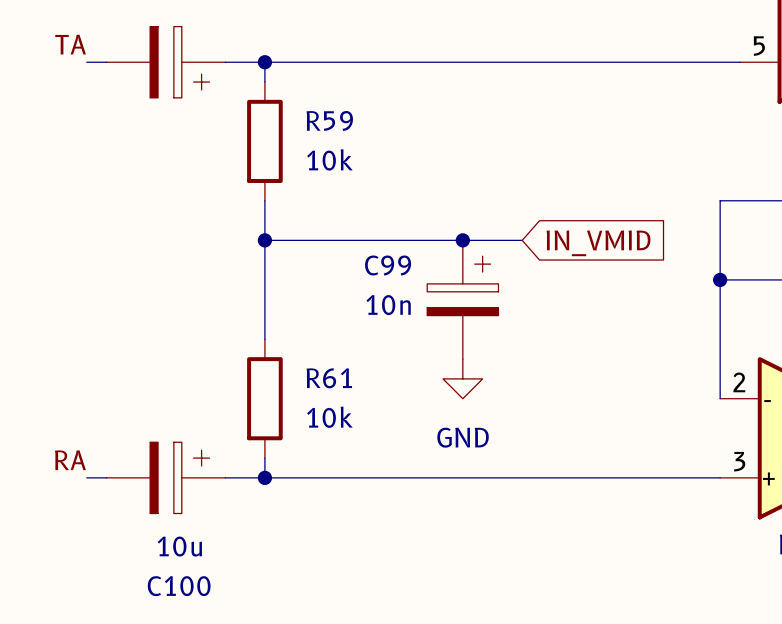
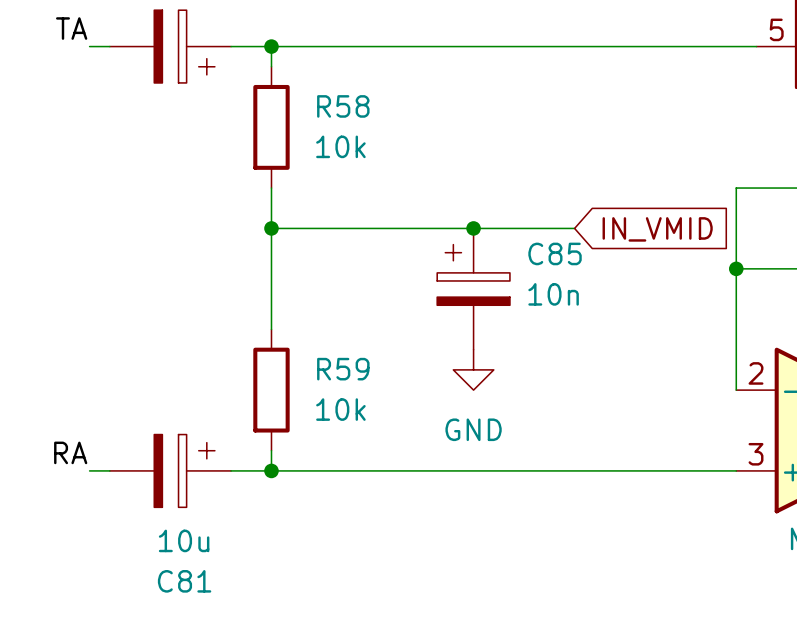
R59 name: R59 (329, 121) -> R58 (343, 106)
wire: none -> (534, 228) (574, 228)
global label position: IN_VMID (598, 243) -> IN_VMID (657, 229)
C99: 10n (462, 299) -> none
C85: none -> 10n (473, 289)
R61 name: R61 (329, 378) -> R59 (343, 369)
C100 name: C100 (179, 586) -> C81 (184, 581)

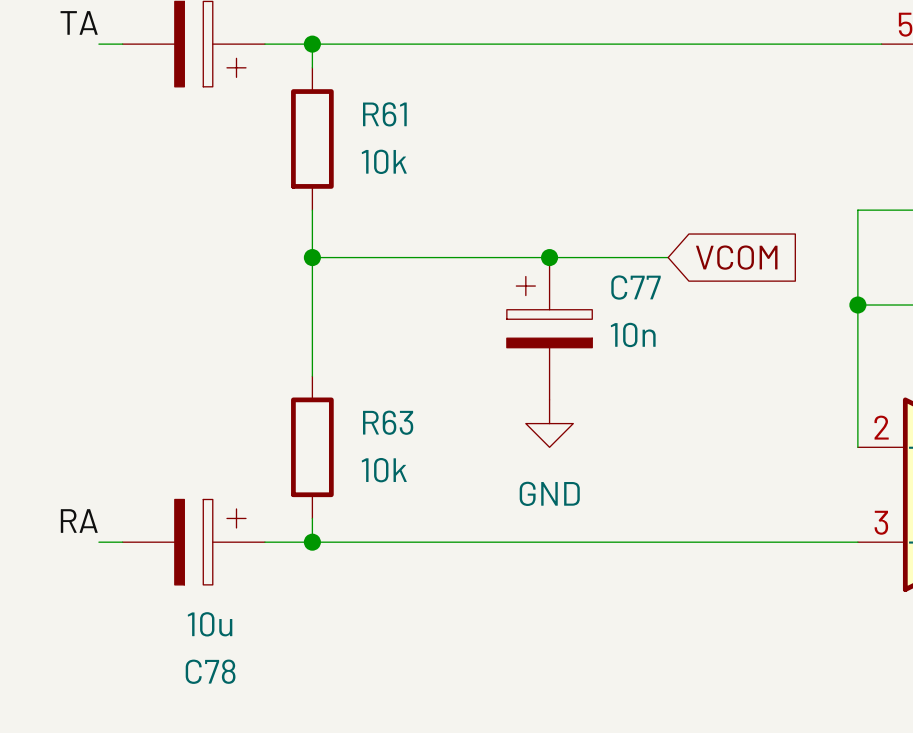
R58 name: R58 (343, 106) -> R61 (384, 114)
global label: IN_VMID (657, 229) -> VCOM (736, 257)
C85 name: C85 (555, 253) -> C77 (636, 287)
R59 name: R59 (343, 369) -> R63 (388, 422)
C81 name: C81 (184, 581) -> C78 (210, 671)

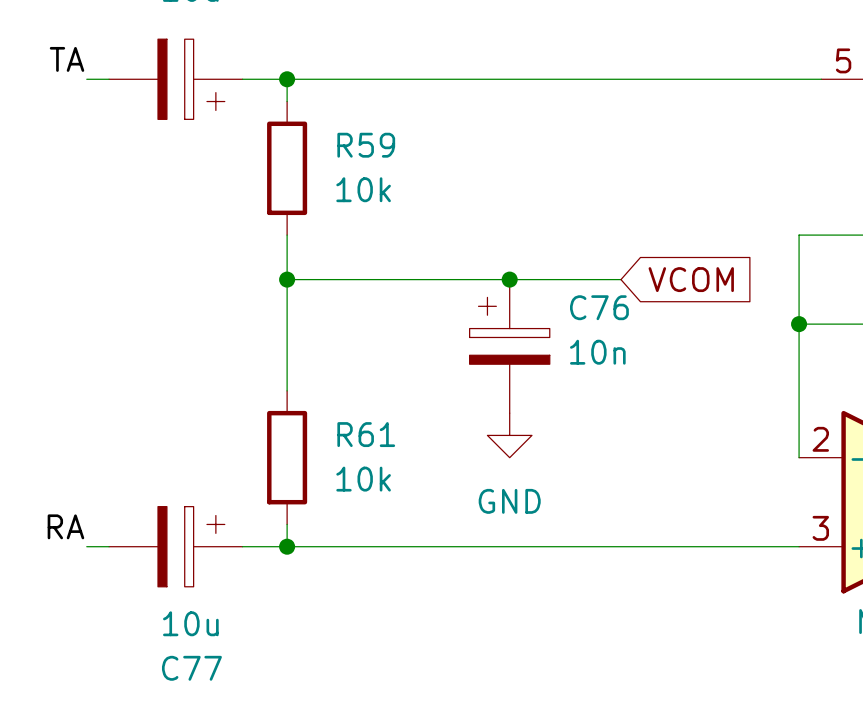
R61 name: R61 (384, 114) -> R59 (366, 145)
C77 name: C77 (636, 287) -> C76 (599, 307)
R63 name: R63 (388, 422) -> R61 (366, 434)
C78 name: C78 (210, 671) -> C77 (191, 668)

